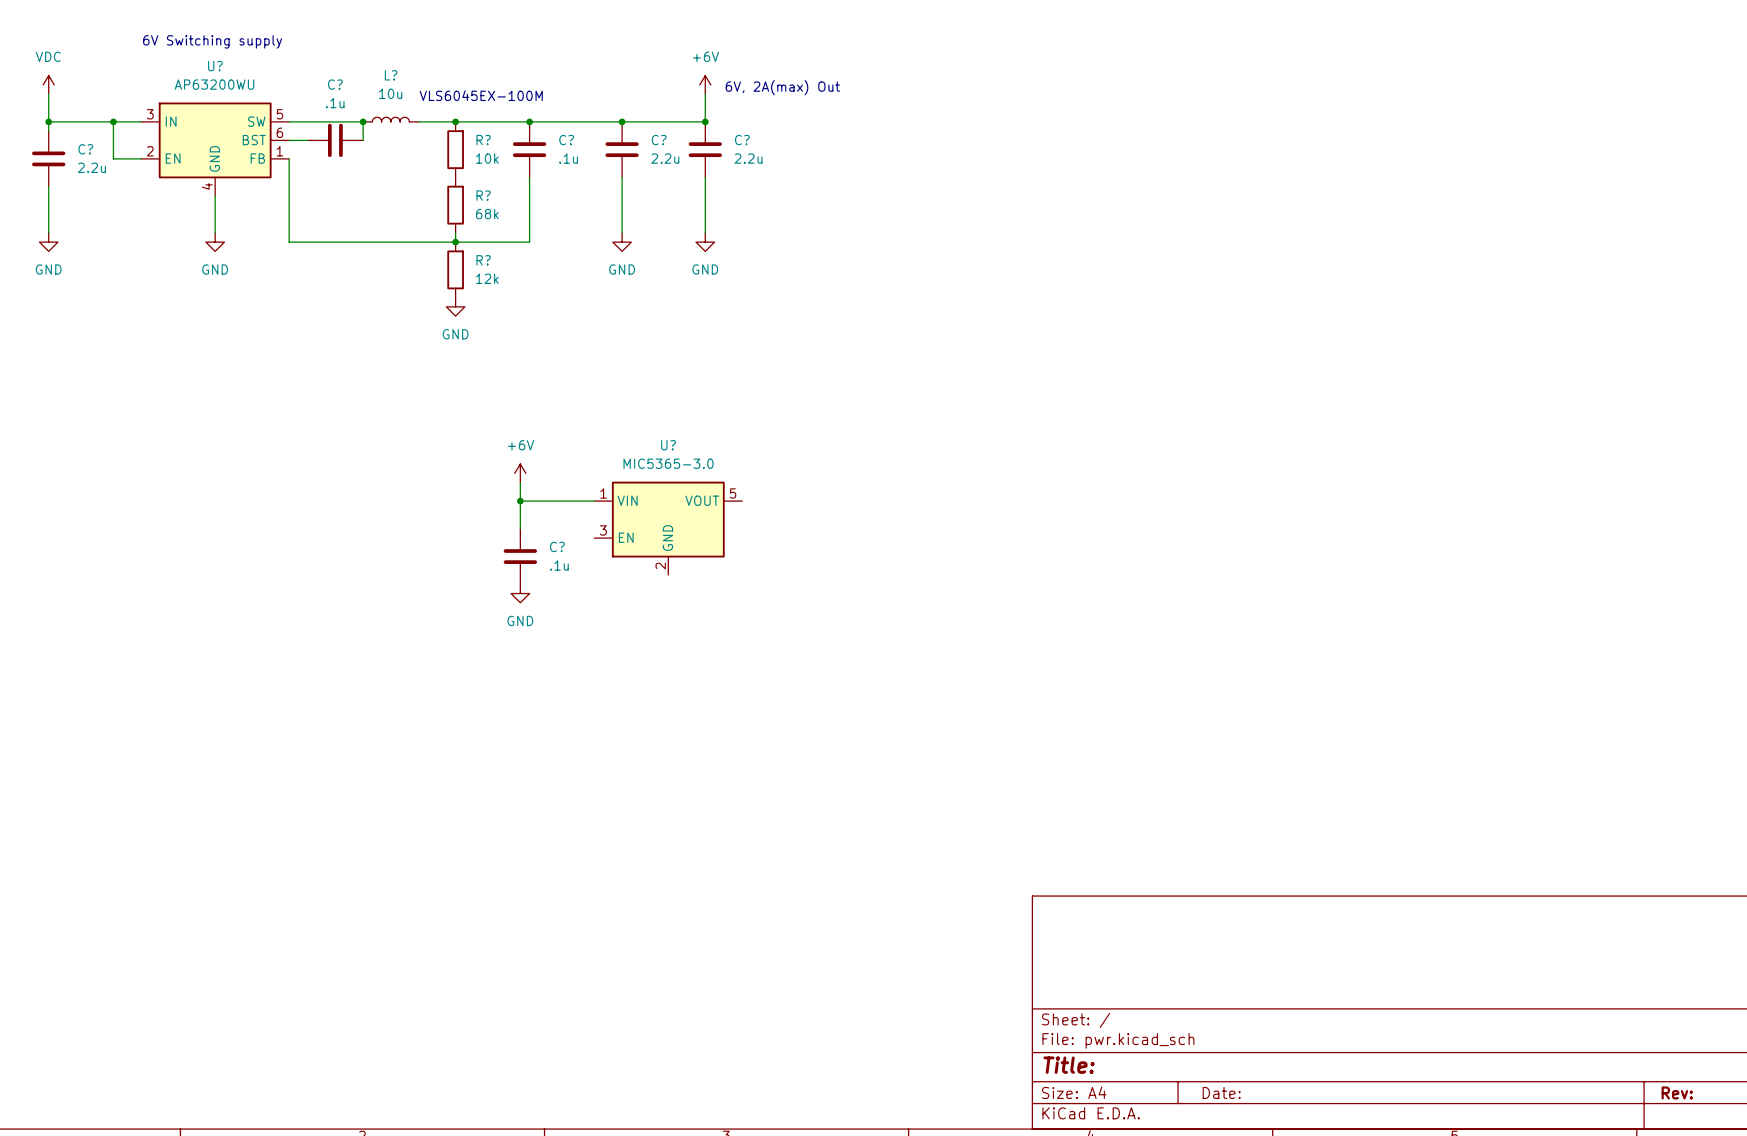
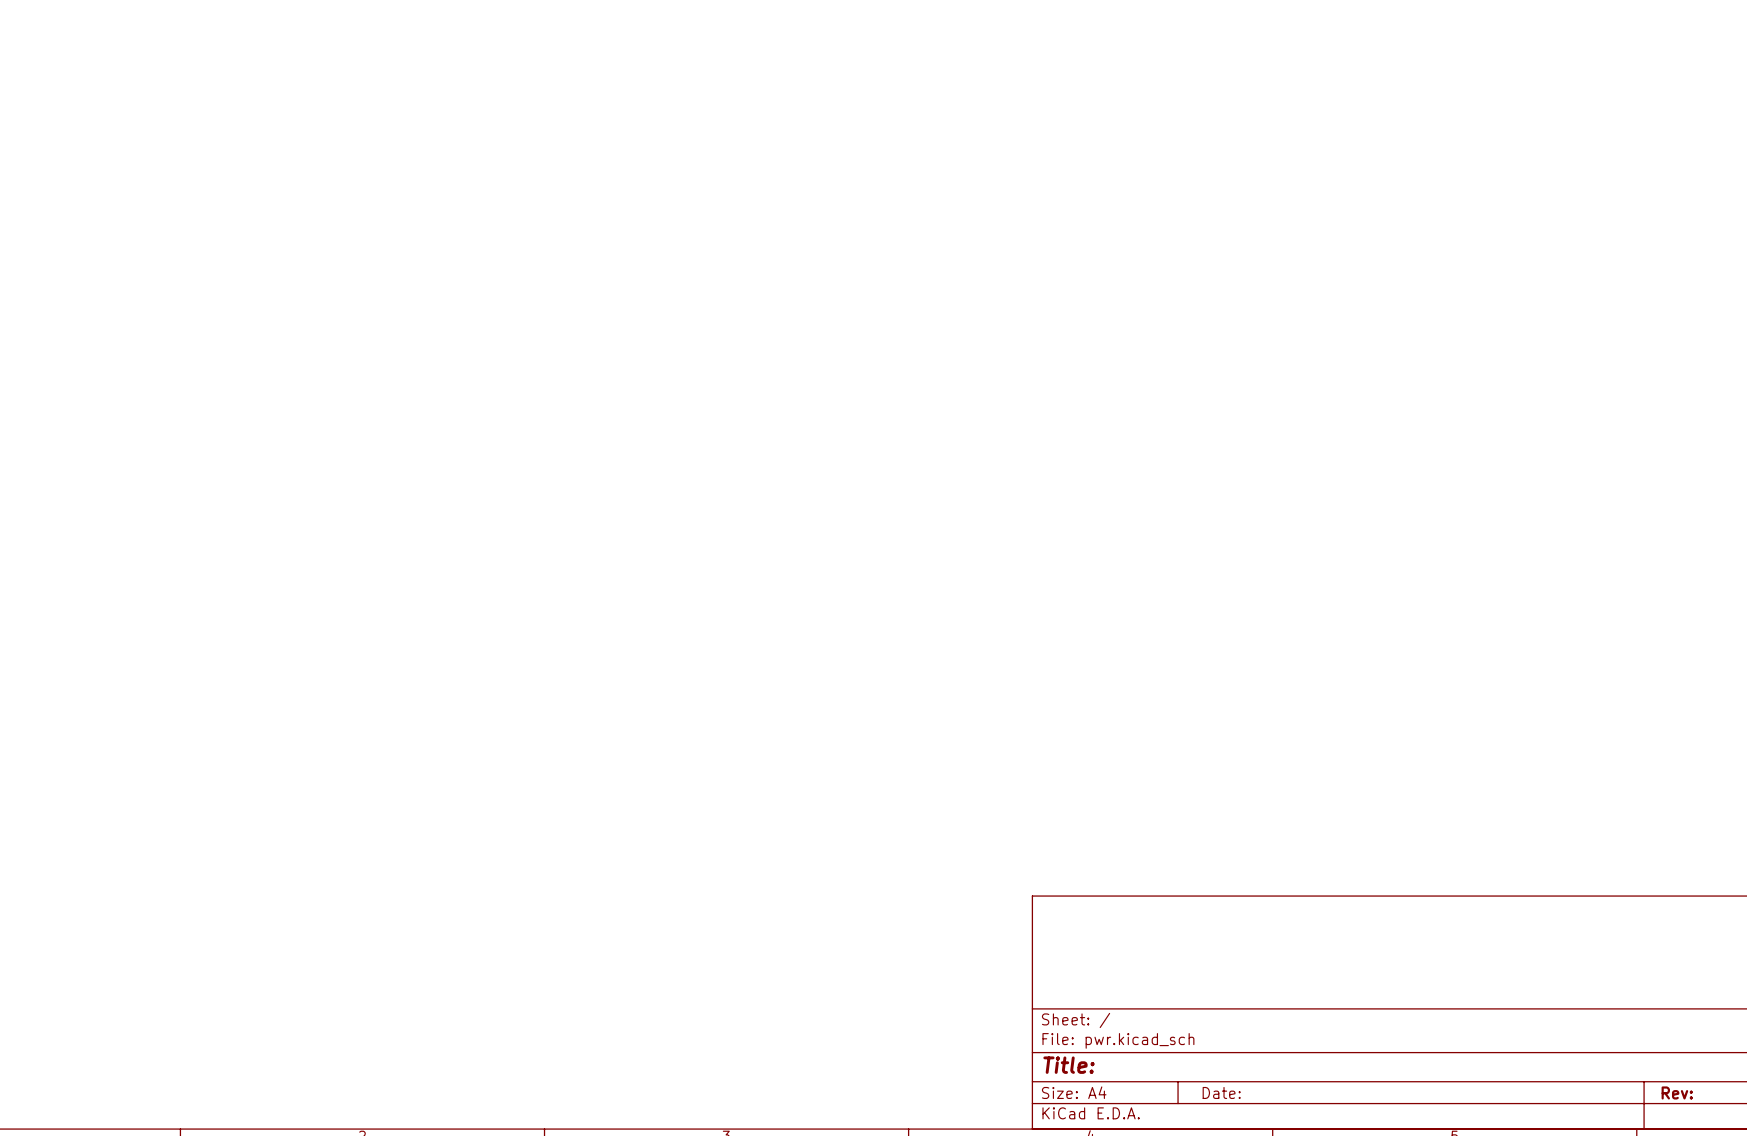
text: 6V Switching supply (212, 41) -> none
power symbol: VDC (48, 84) -> none
power symbol: +6V (705, 84) -> none
text: 6V, 2A(max) Out (782, 87) -> none
wire: (48, 94) (48, 131) -> none
wire: (705, 94) (705, 121) (418, 121) -> none
text: VLS6045EX-100M (481, 95) -> none
L?: 10u (390, 119) -> none
wire: (48, 121) (141, 121) -> none
junction: (48, 121) -> none
wire: (113, 121) (113, 158) (141, 158) -> none
junction: (113, 121) -> none
wire: (289, 121) (363, 121) (363, 140) -> none
junction: (363, 121) -> none
junction: (455, 121) -> none
junction: (529, 121) -> none
junction: (622, 121) -> none
junction: (705, 121) -> none
wire: (289, 140) (307, 140) -> none
C?: .1u (335, 140) -> none
U?: AP63200WU (215, 149) -> none
R?: 10k (455, 149) -> none
C?: .1u (529, 149) -> none
C?: 2.2u (622, 149) -> none
C?: 2.2u (705, 149) -> none
C?: 2.2u (48, 158) -> none
wire: (289, 158) (289, 242) (529, 242) (529, 177) -> none
wire: (622, 177) (622, 232) -> none
wire: (705, 177) (705, 232) -> none
wire: (48, 186) (48, 232) -> none
wire: (215, 195) (215, 232) -> none
R?: 68k (455, 205) -> none
wire: (455, 232) (455, 242) -> none
power symbol: GND (48, 242) -> none
power symbol: GND (215, 242) -> none
junction: (455, 242) -> none
power symbol: GND (622, 242) -> none
power symbol: GND (705, 242) -> none
R?: 12k (455, 269) -> none
power symbol: GND (455, 306) -> none
power symbol: +6V (520, 473) -> none
wire: (520, 482) (520, 528) -> none
wire: (520, 501) (594, 501) -> none
junction: (520, 501) -> none
U?: MIC5365-3.0 (668, 528) -> none
C?: .1u (520, 556) -> none
power symbol: GND (520, 593) -> none

